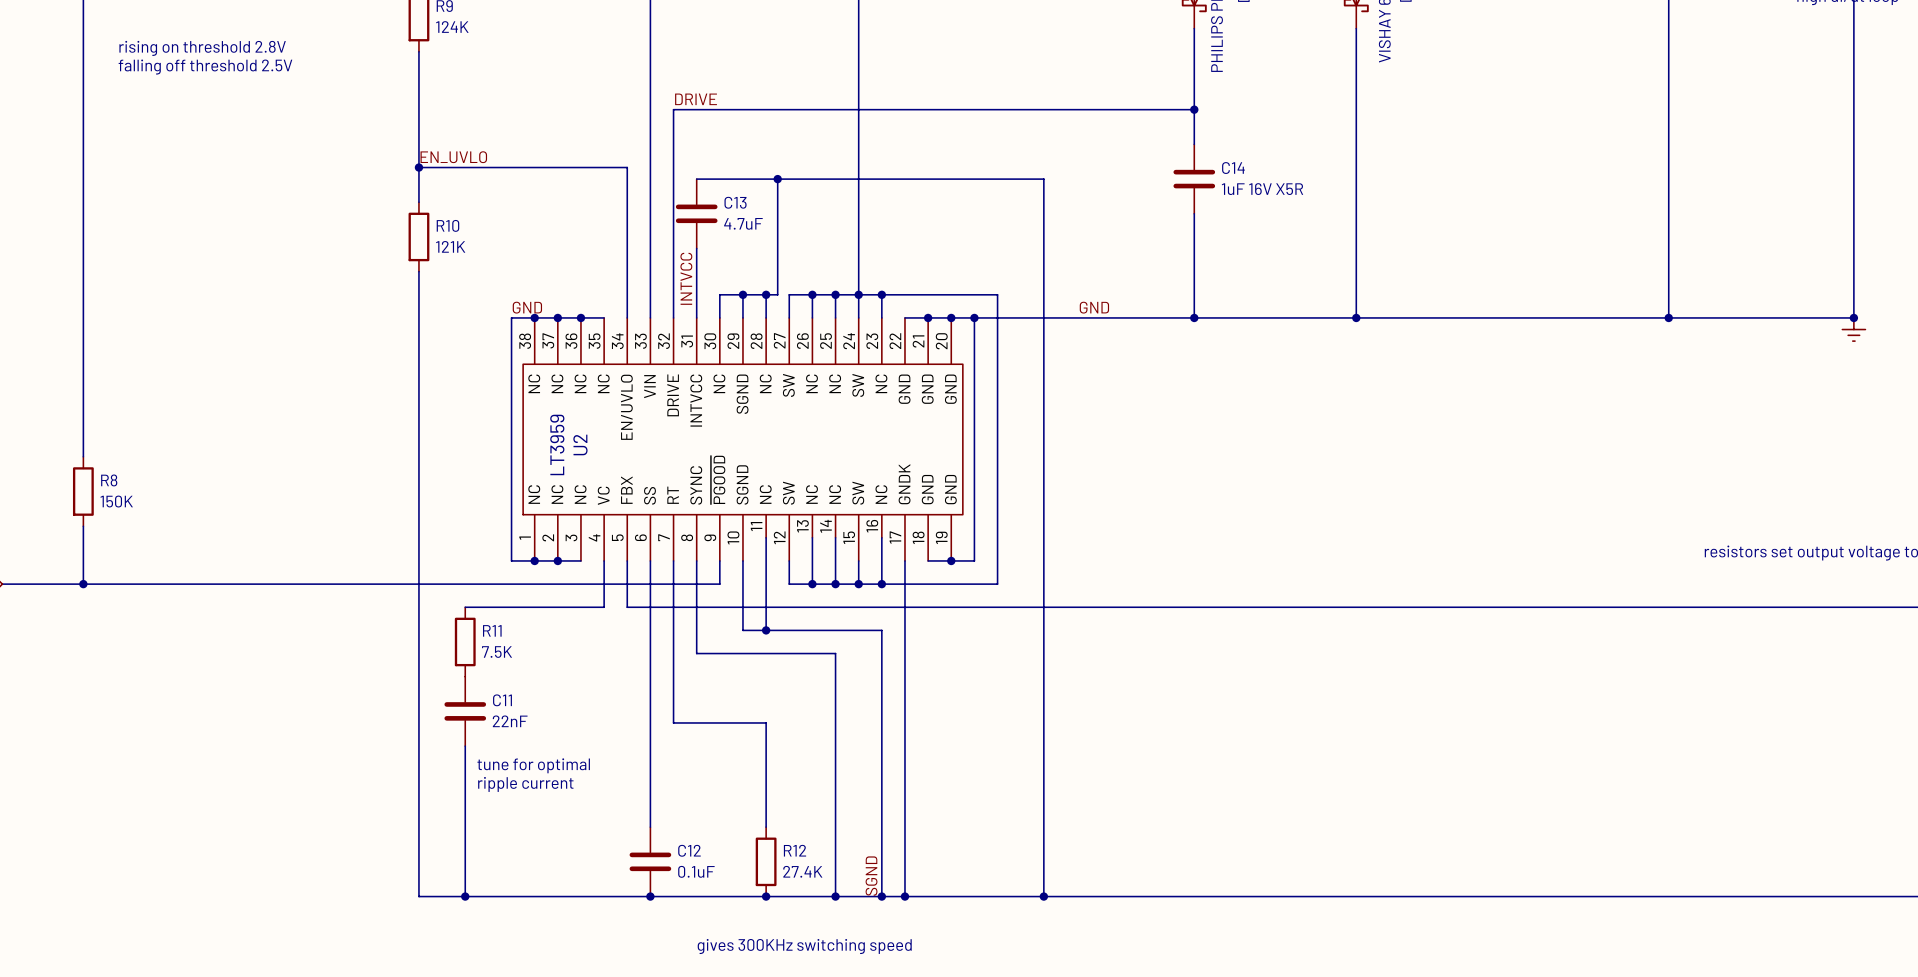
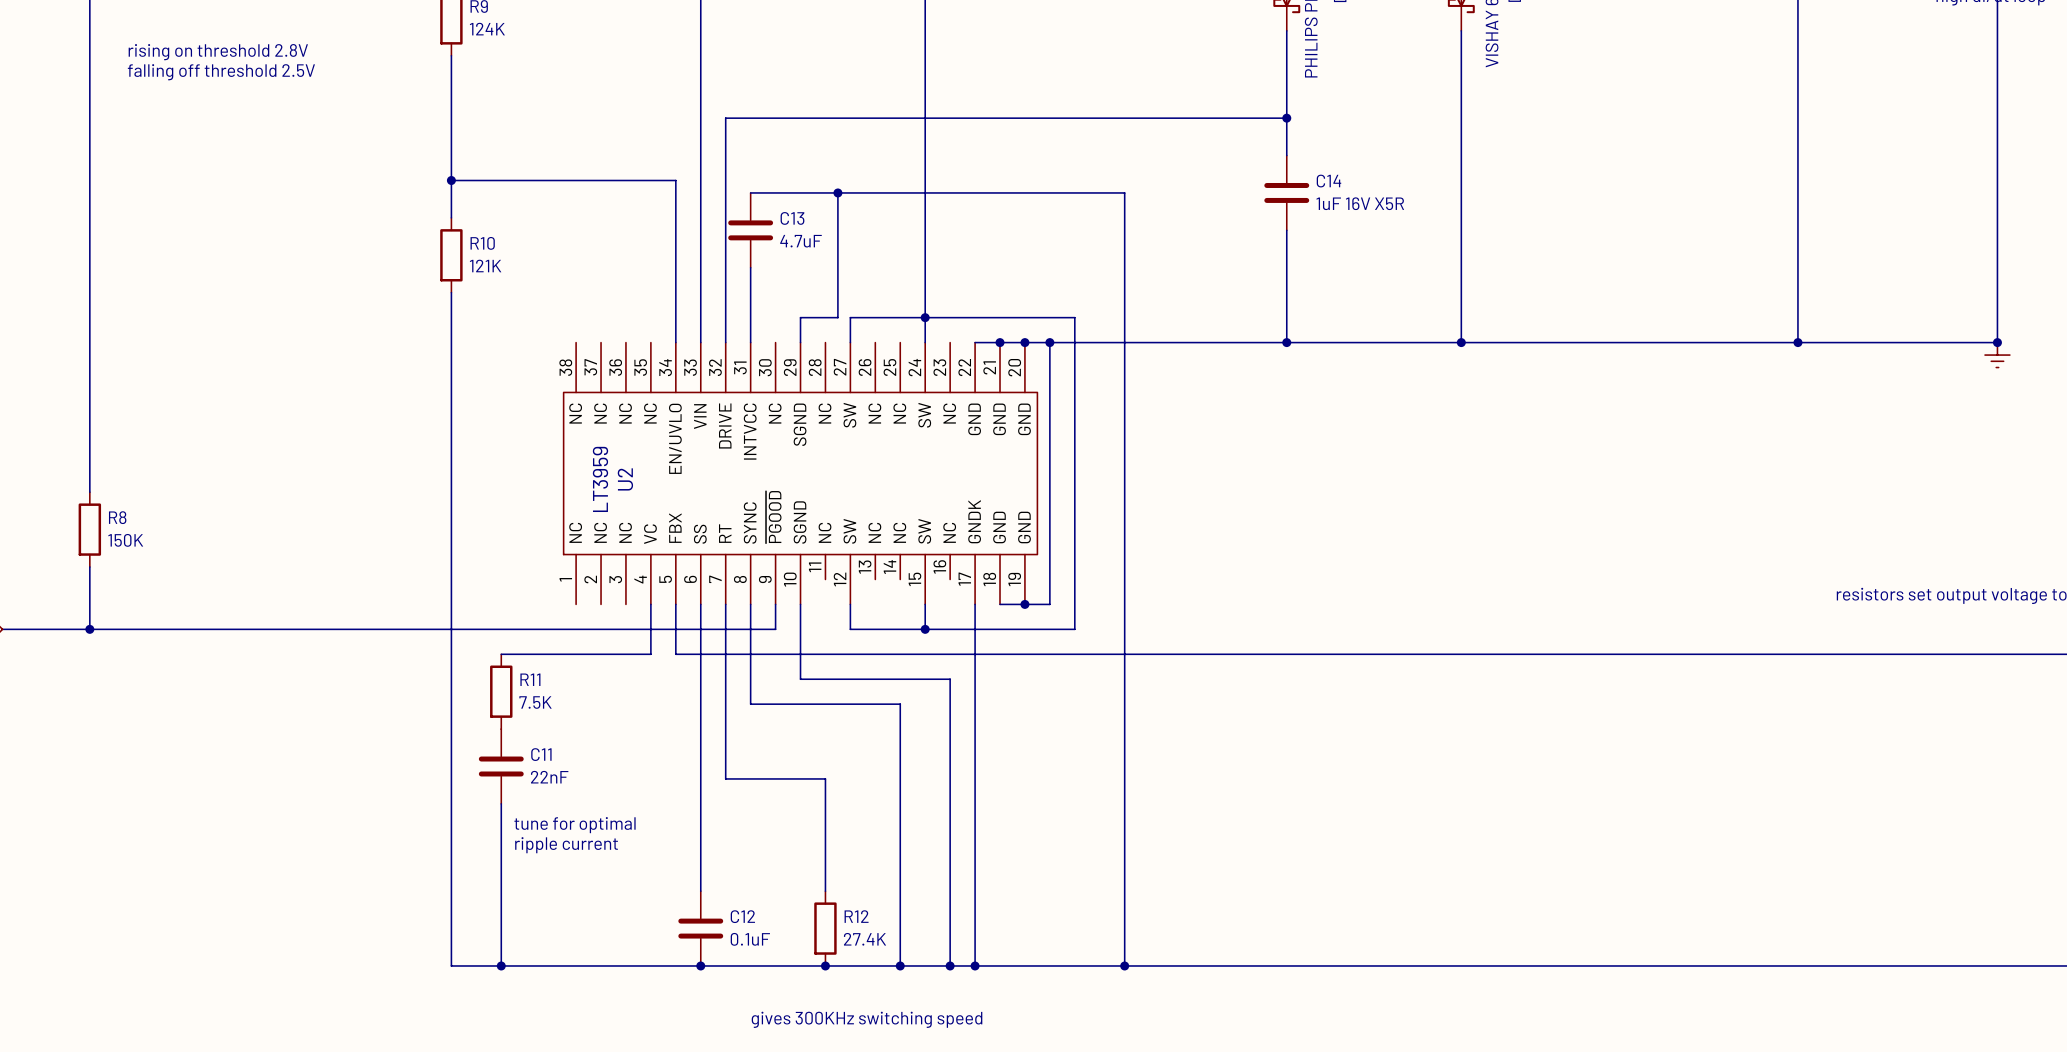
label: DRIVE (696, 99) -> none
label: EN_UVLO (453, 157) -> none
label: INTVCC (686, 278) -> none
wire: (742, 294) (719, 294) (719, 317) -> none
junction: (742, 294) -> none
wire: (766, 294) (766, 317) -> none
junction: (766, 294) -> none
wire: (812, 294) (812, 317) -> none
junction: (812, 294) -> none
wire: (835, 294) (835, 317) -> none
junction: (835, 294) -> none
wire: (881, 294) (881, 317) -> none
junction: (881, 294) -> none
label: GND (527, 307) -> none
label: GND (1094, 307) -> none
junction: (534, 317) -> none
junction: (557, 317) -> none
junction: (580, 317) -> none
wire: (604, 317) (511, 317) (511, 560) (580, 560) -> none
wire: (766, 537) (766, 630) -> none
wire: (812, 537) (812, 584) -> none
wire: (835, 537) (835, 584) -> none
wire: (881, 537) (881, 584) -> none
junction: (534, 560) -> none
junction: (557, 560) -> none
junction: (812, 584) -> none
junction: (835, 584) -> none
junction: (881, 584) -> none
junction: (766, 630) -> none
label: SGND (871, 876) -> none

